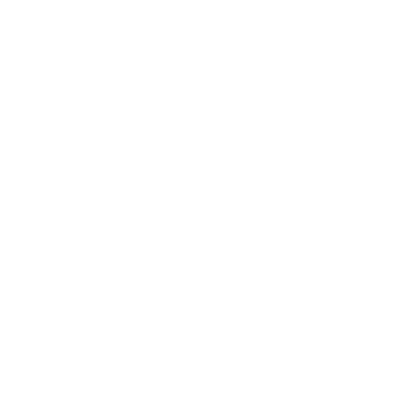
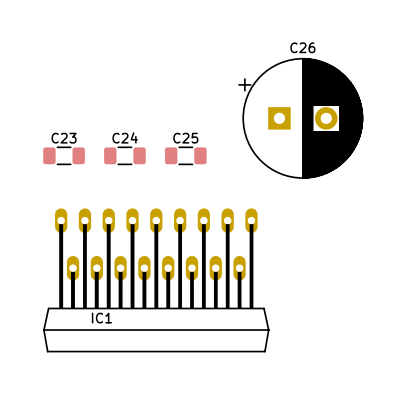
C26: none -> (300, 118)
C23: none -> (64, 155)
C24: none -> (124, 155)
C25: none -> (185, 155)
IC1: none -> (156, 280)

